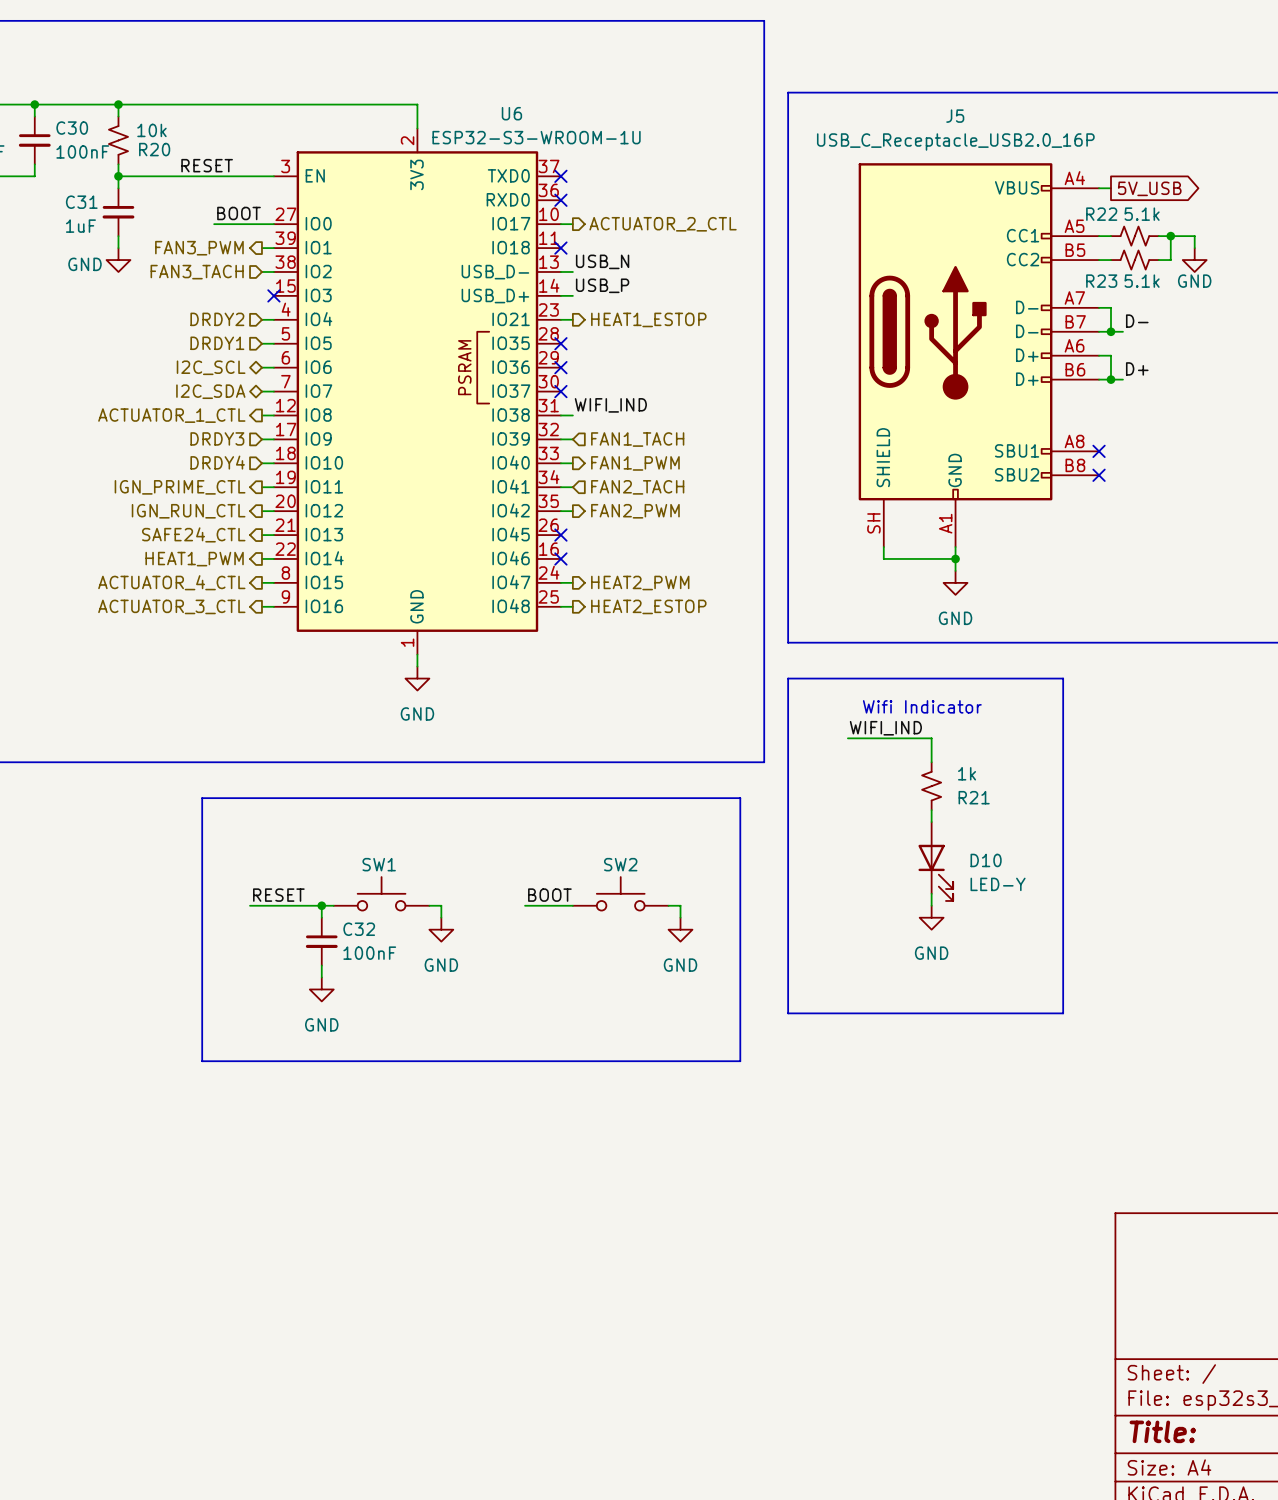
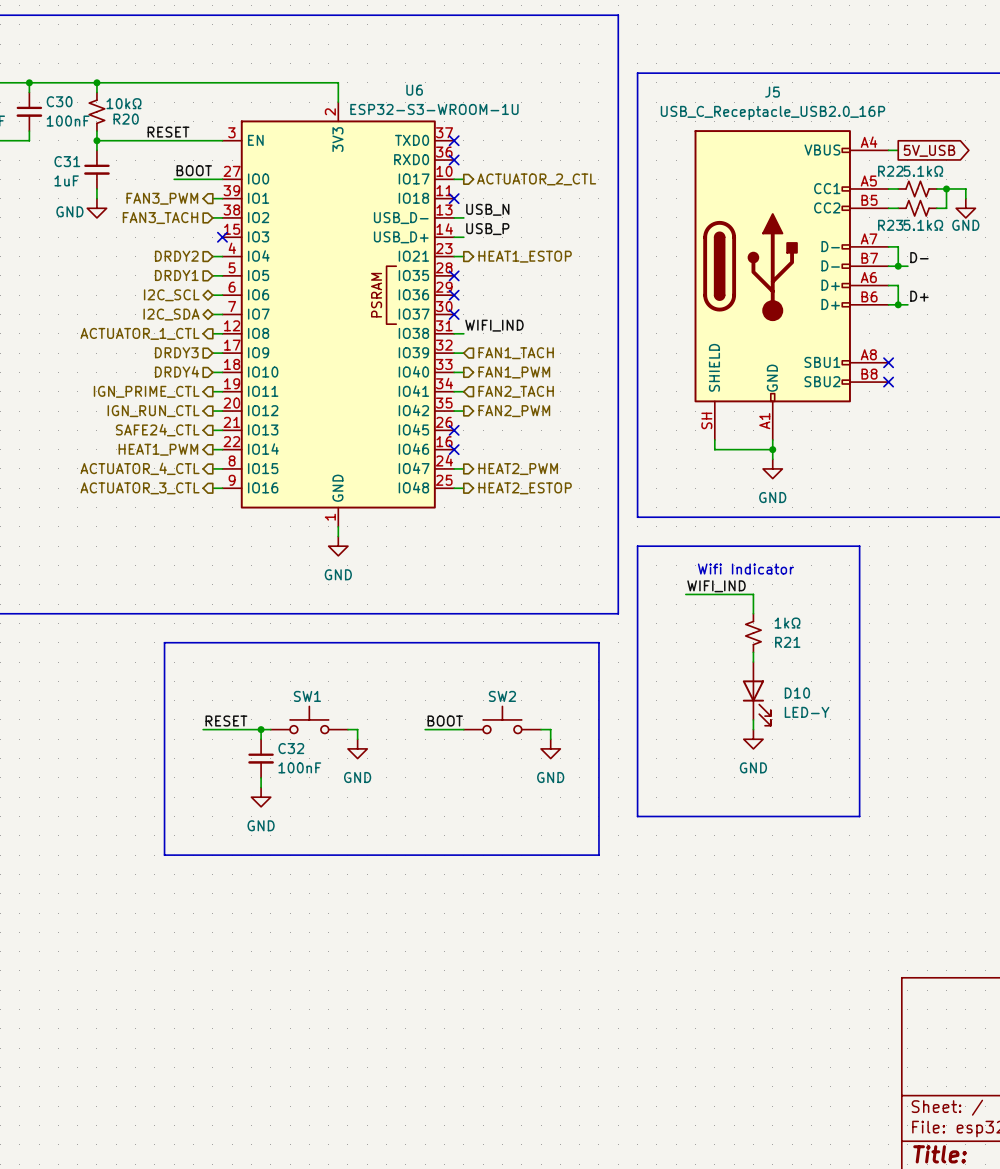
R20 value: 10k (151, 130) -> 10kΩ (123, 103)
R22 value: 5.1k (1142, 214) -> 5.1kΩ (923, 171)
R23 value: 5.1k (1142, 281) -> 5.1kΩ (923, 225)
R21 value: 1k (967, 773) -> 1kΩ (787, 623)

